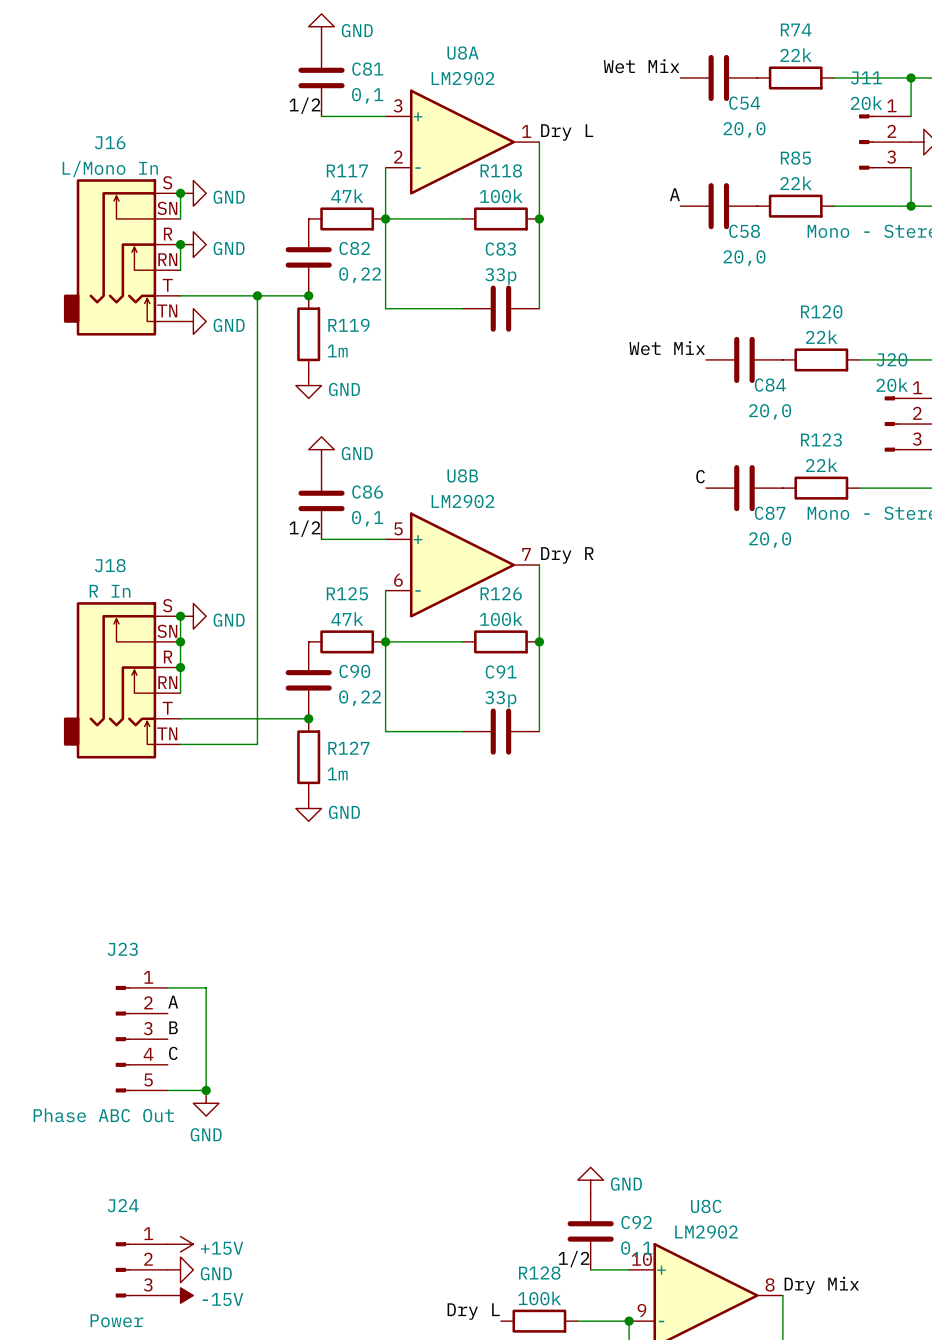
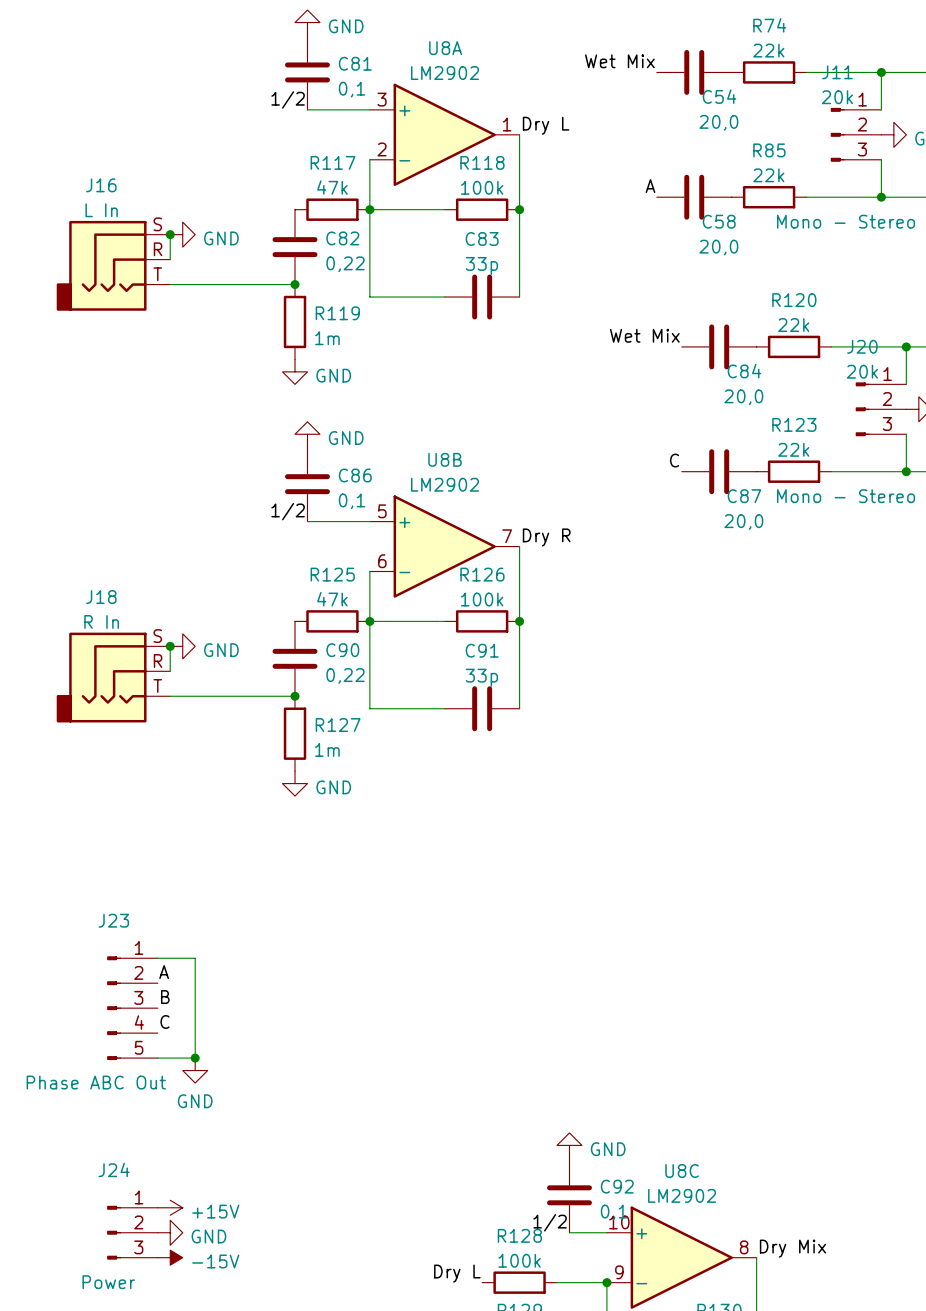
J16 name position: J16 (110, 142) -> J16 (101, 185)
J16 value: L/Mono In (110, 169) -> L In (101, 210)
J16 symbol: [63, 179, 181, 336] -> [56, 220, 171, 311]
wire: (180, 193) (180, 218) -> none
junction: (180, 193) -> none
power symbol: GND (193, 193) -> none
wire: (257, 295) (257, 744) (180, 744) -> none
junction: (257, 295) -> none
power symbol: GND (193, 321) -> none
J18 name position: J18 (110, 565) -> J18 (101, 597)
J18 value position: R In (110, 591) -> R In (101, 621)
J18 symbol: [63, 602, 181, 759] -> [56, 632, 171, 723]
wire: (180, 616) (180, 667) -> none
junction: (180, 616) -> none
power symbol position: GND (193, 616) -> GND (182, 646)
junction: (180, 641) -> none

